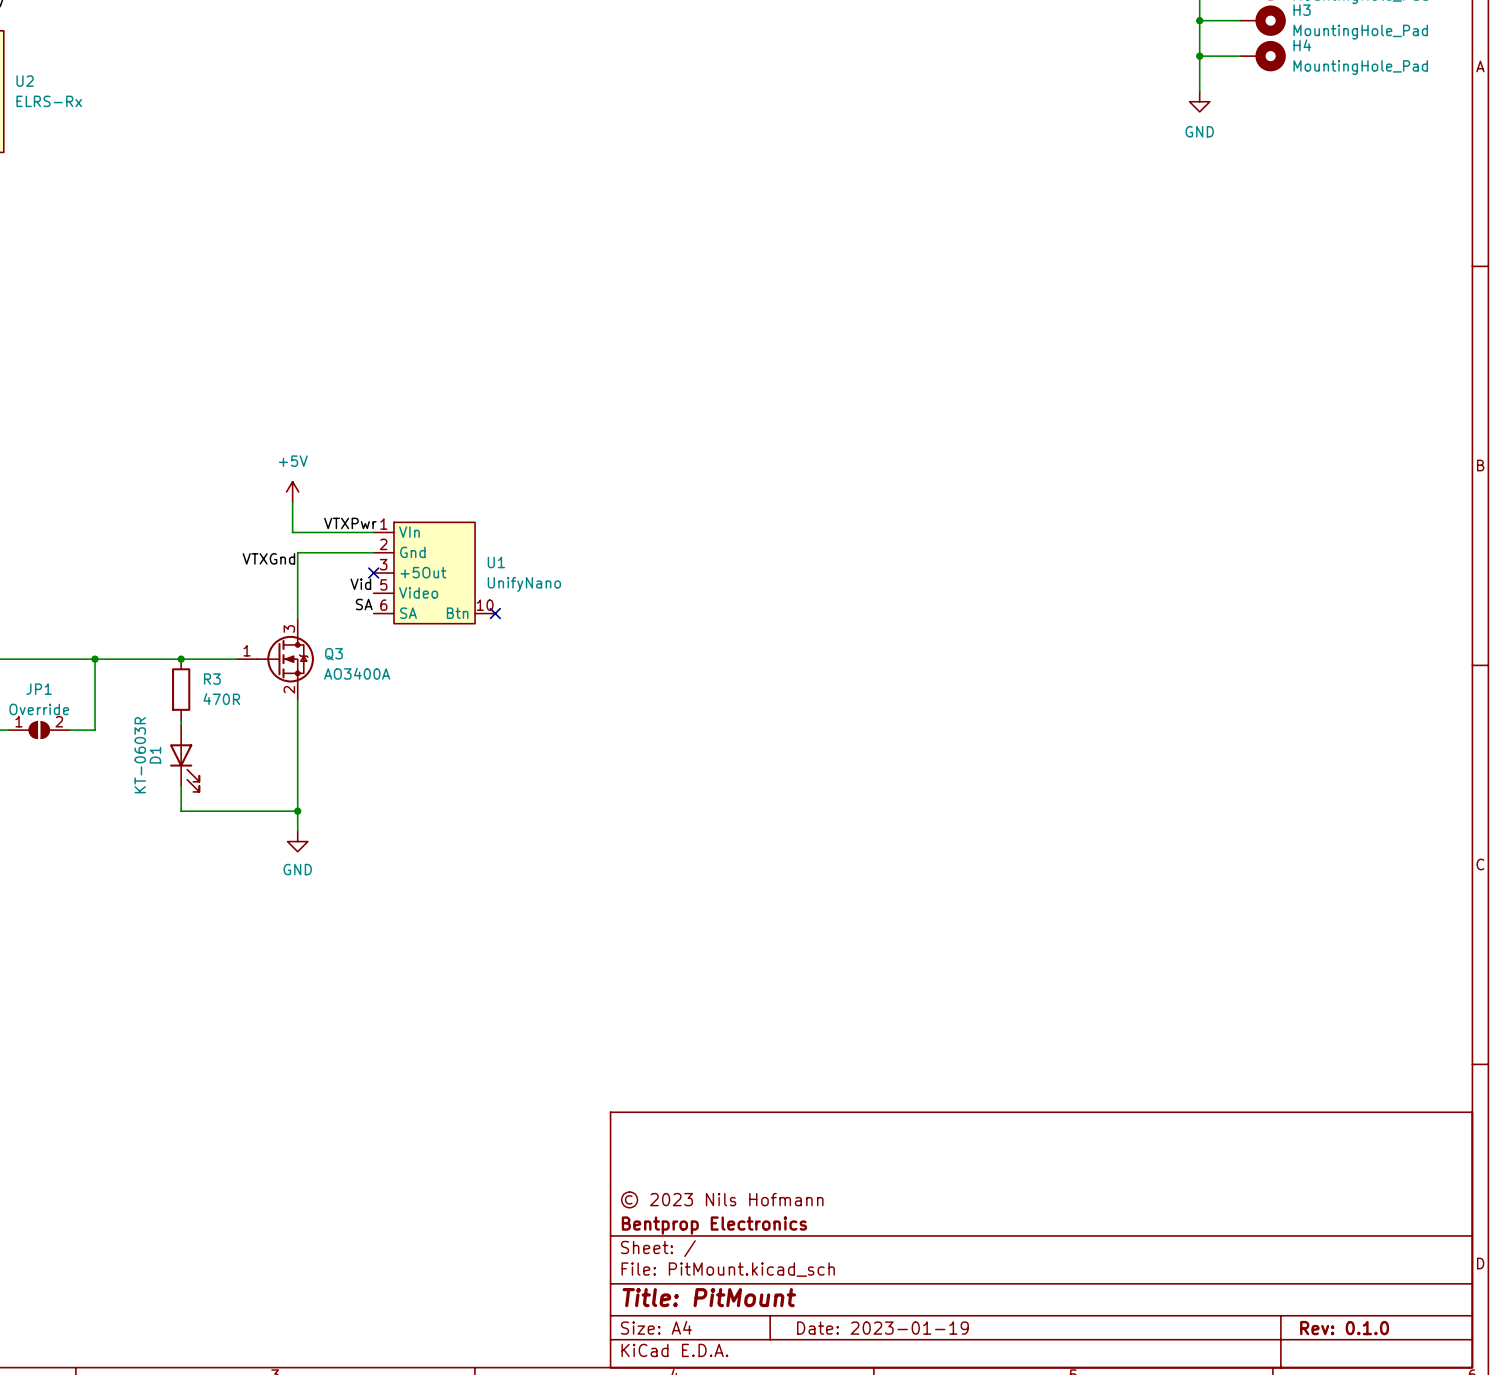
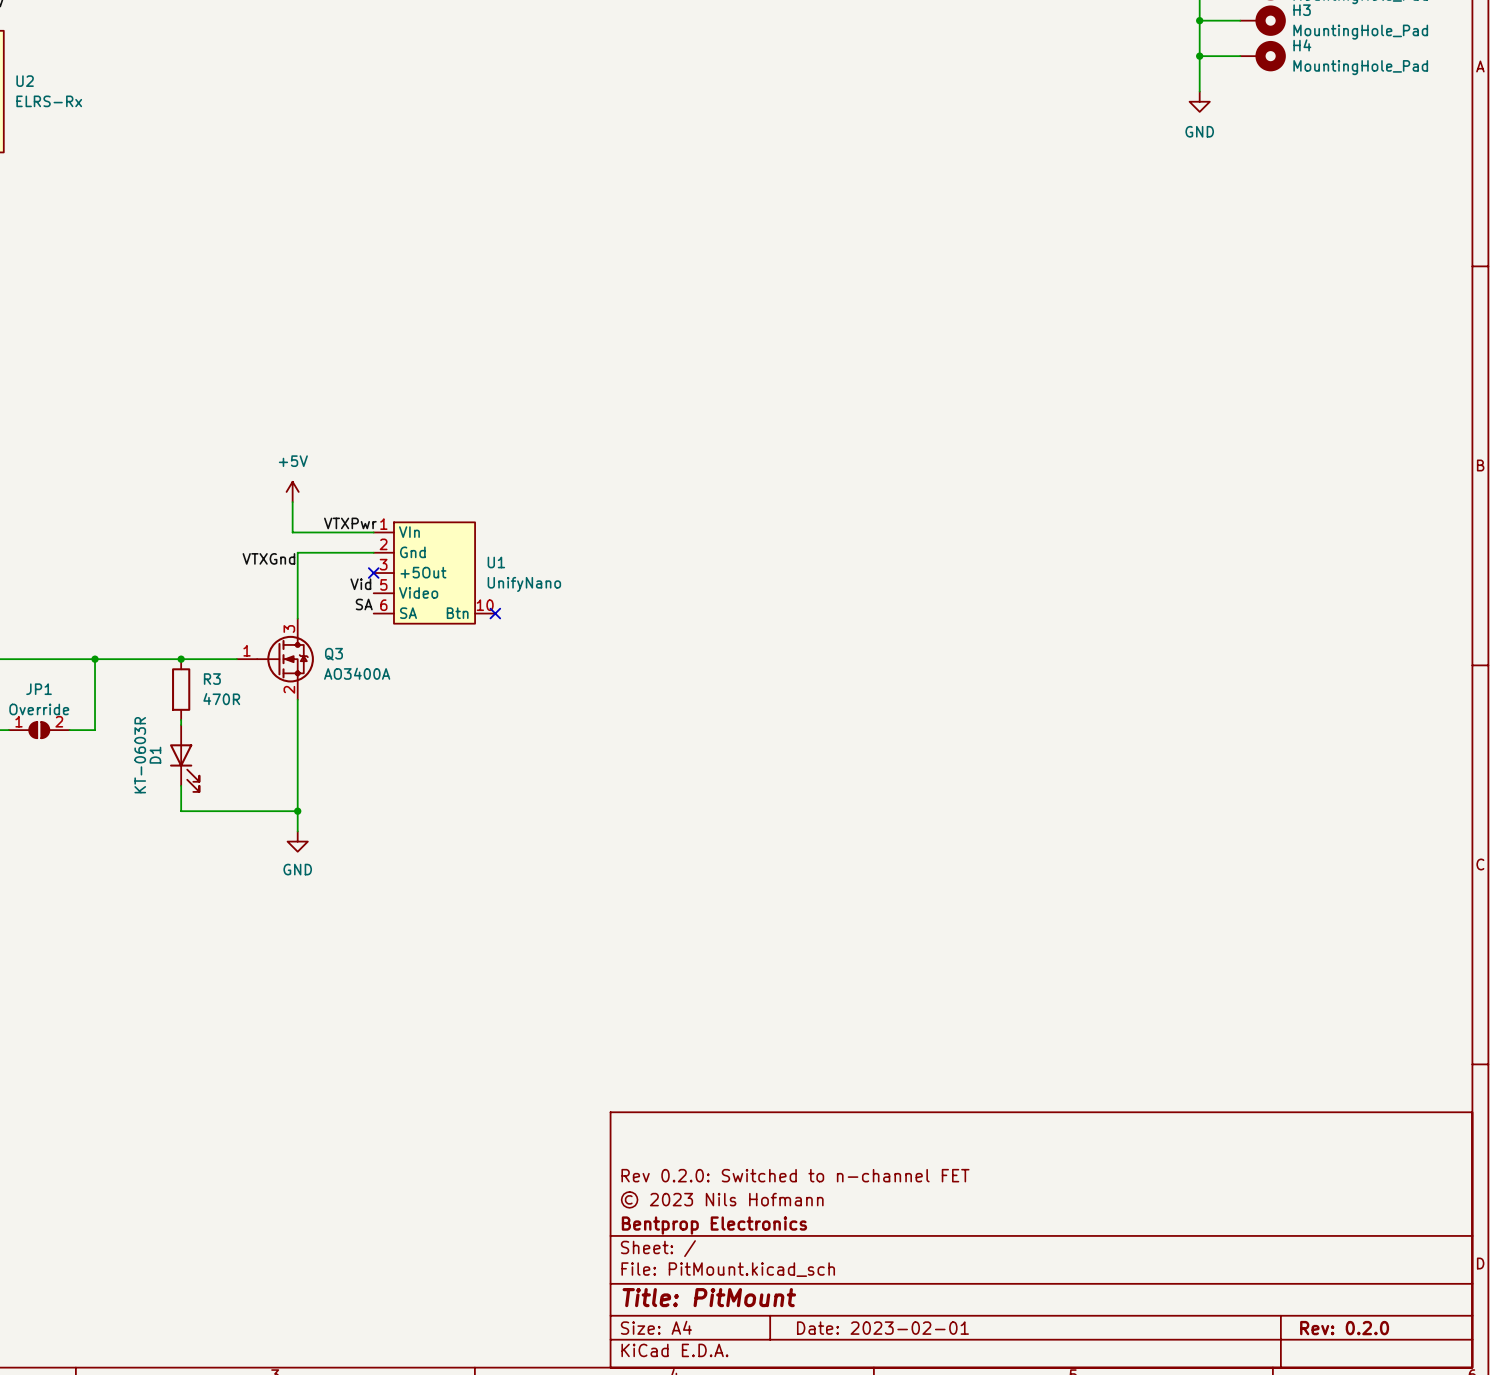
title block: none -> Rev 0.2.0: Switched to n-channel FET (795, 1175)
title block: Date: 2023-01-19 (882, 1328) -> Date: 2023-02-01 (882, 1328)
title block: Rev: 0.1.0 (1344, 1328) -> Rev: 0.2.0 (1344, 1328)

